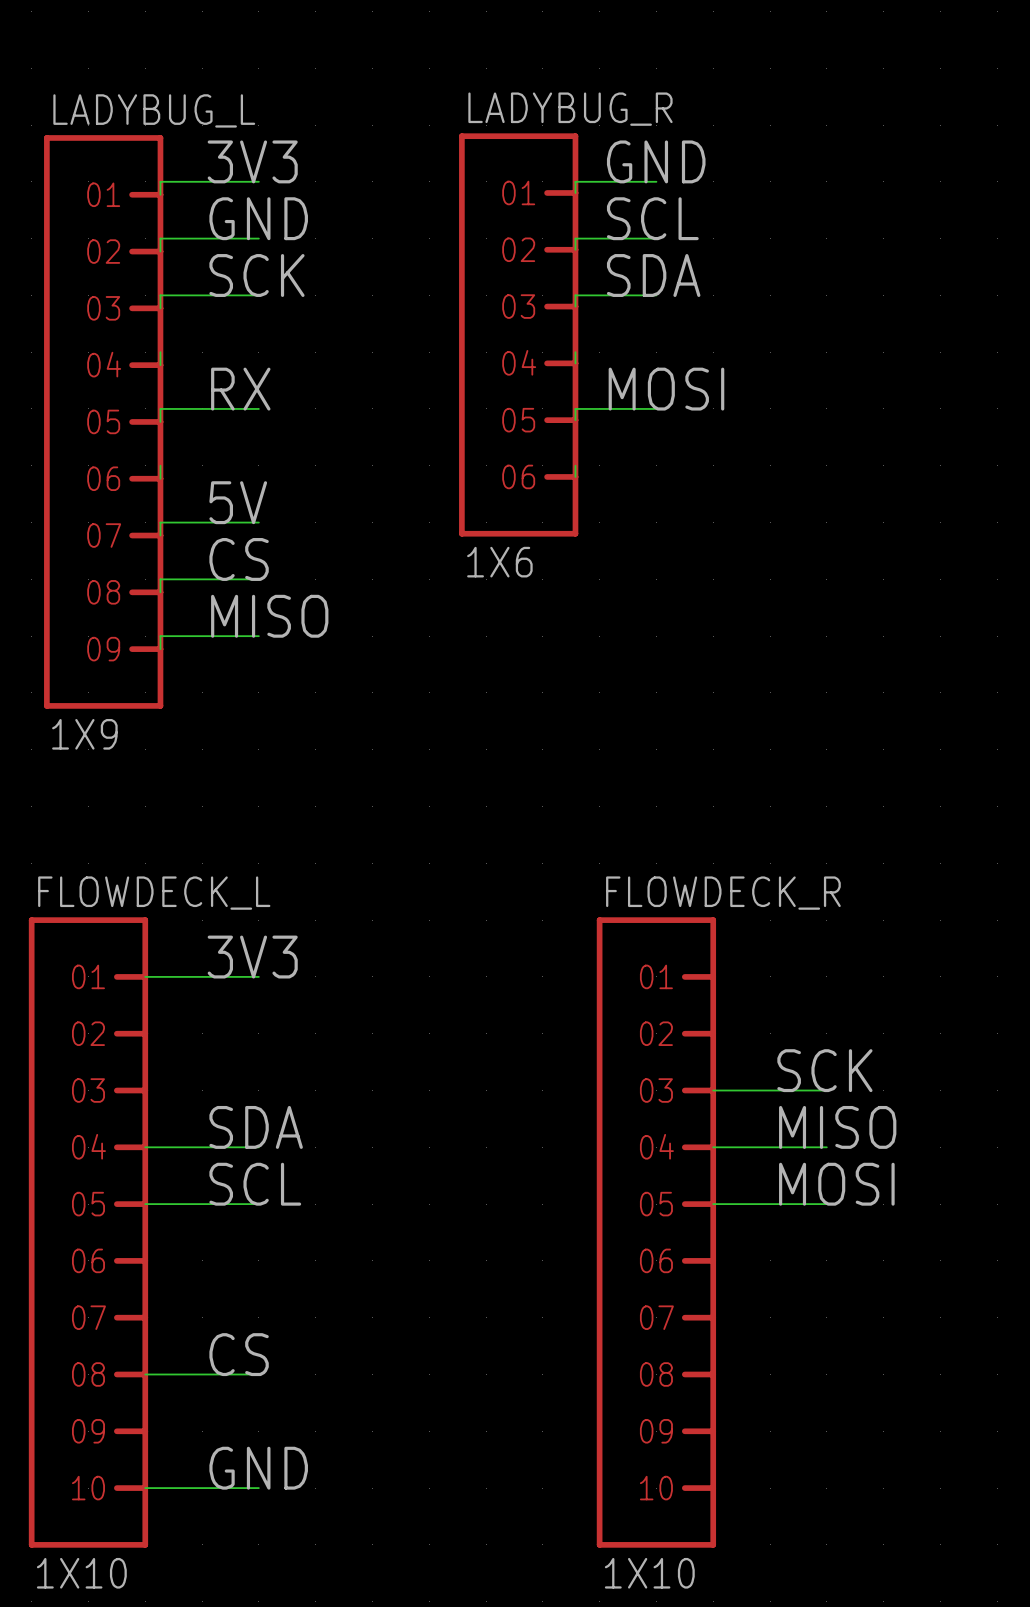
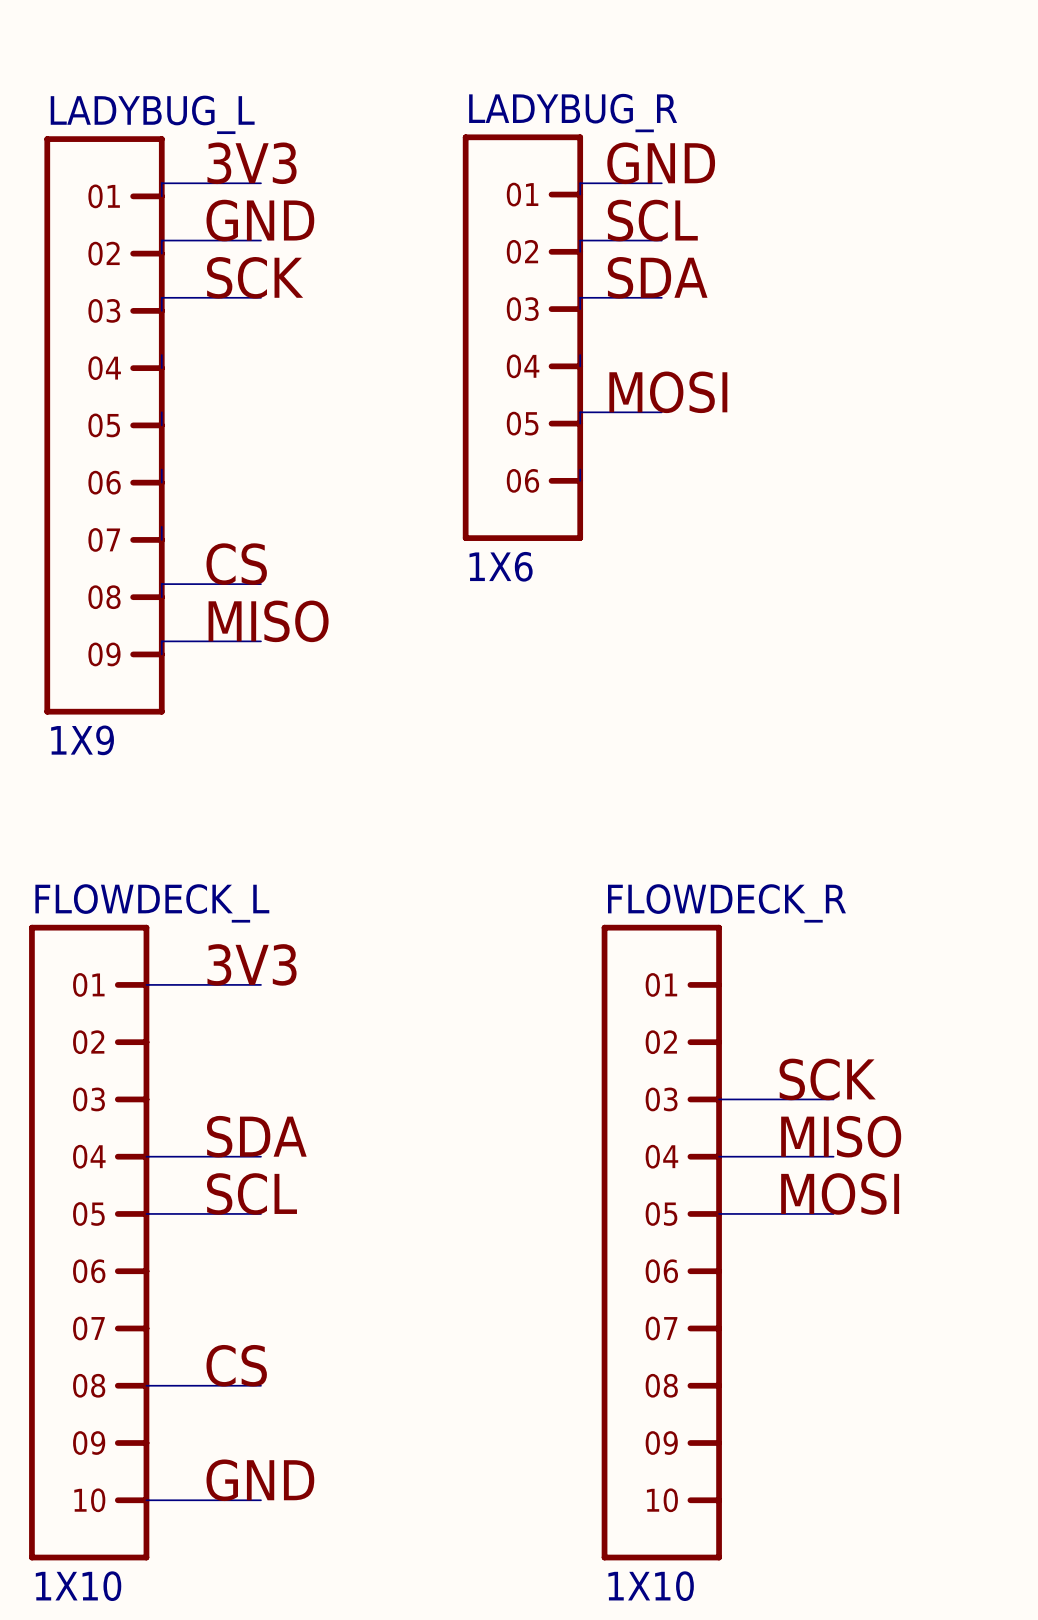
label: RX (240, 389) -> none
wire: (160, 408) (258, 408) -> none
label: 5V (238, 502) -> none
wire: (160, 522) (258, 522) -> none

